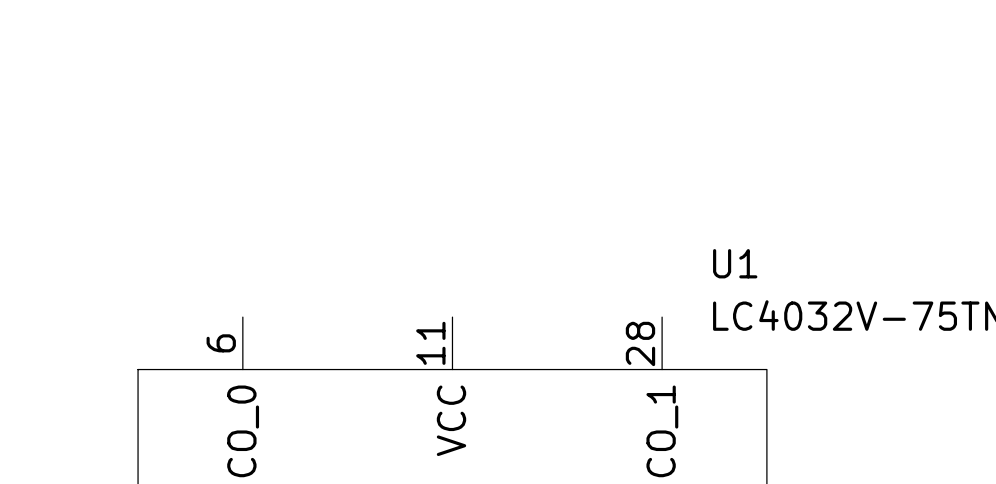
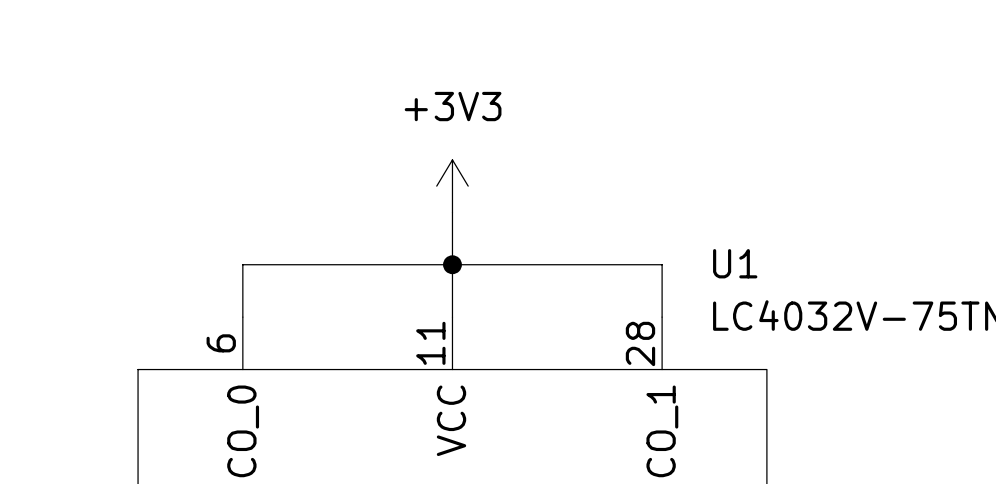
power symbol: none -> +3V3 (452, 186)
wire: none -> (452, 212) (452, 317)
junction: none -> (452, 264)
wire: none -> (242, 317) (242, 264) (662, 264) (662, 317)

